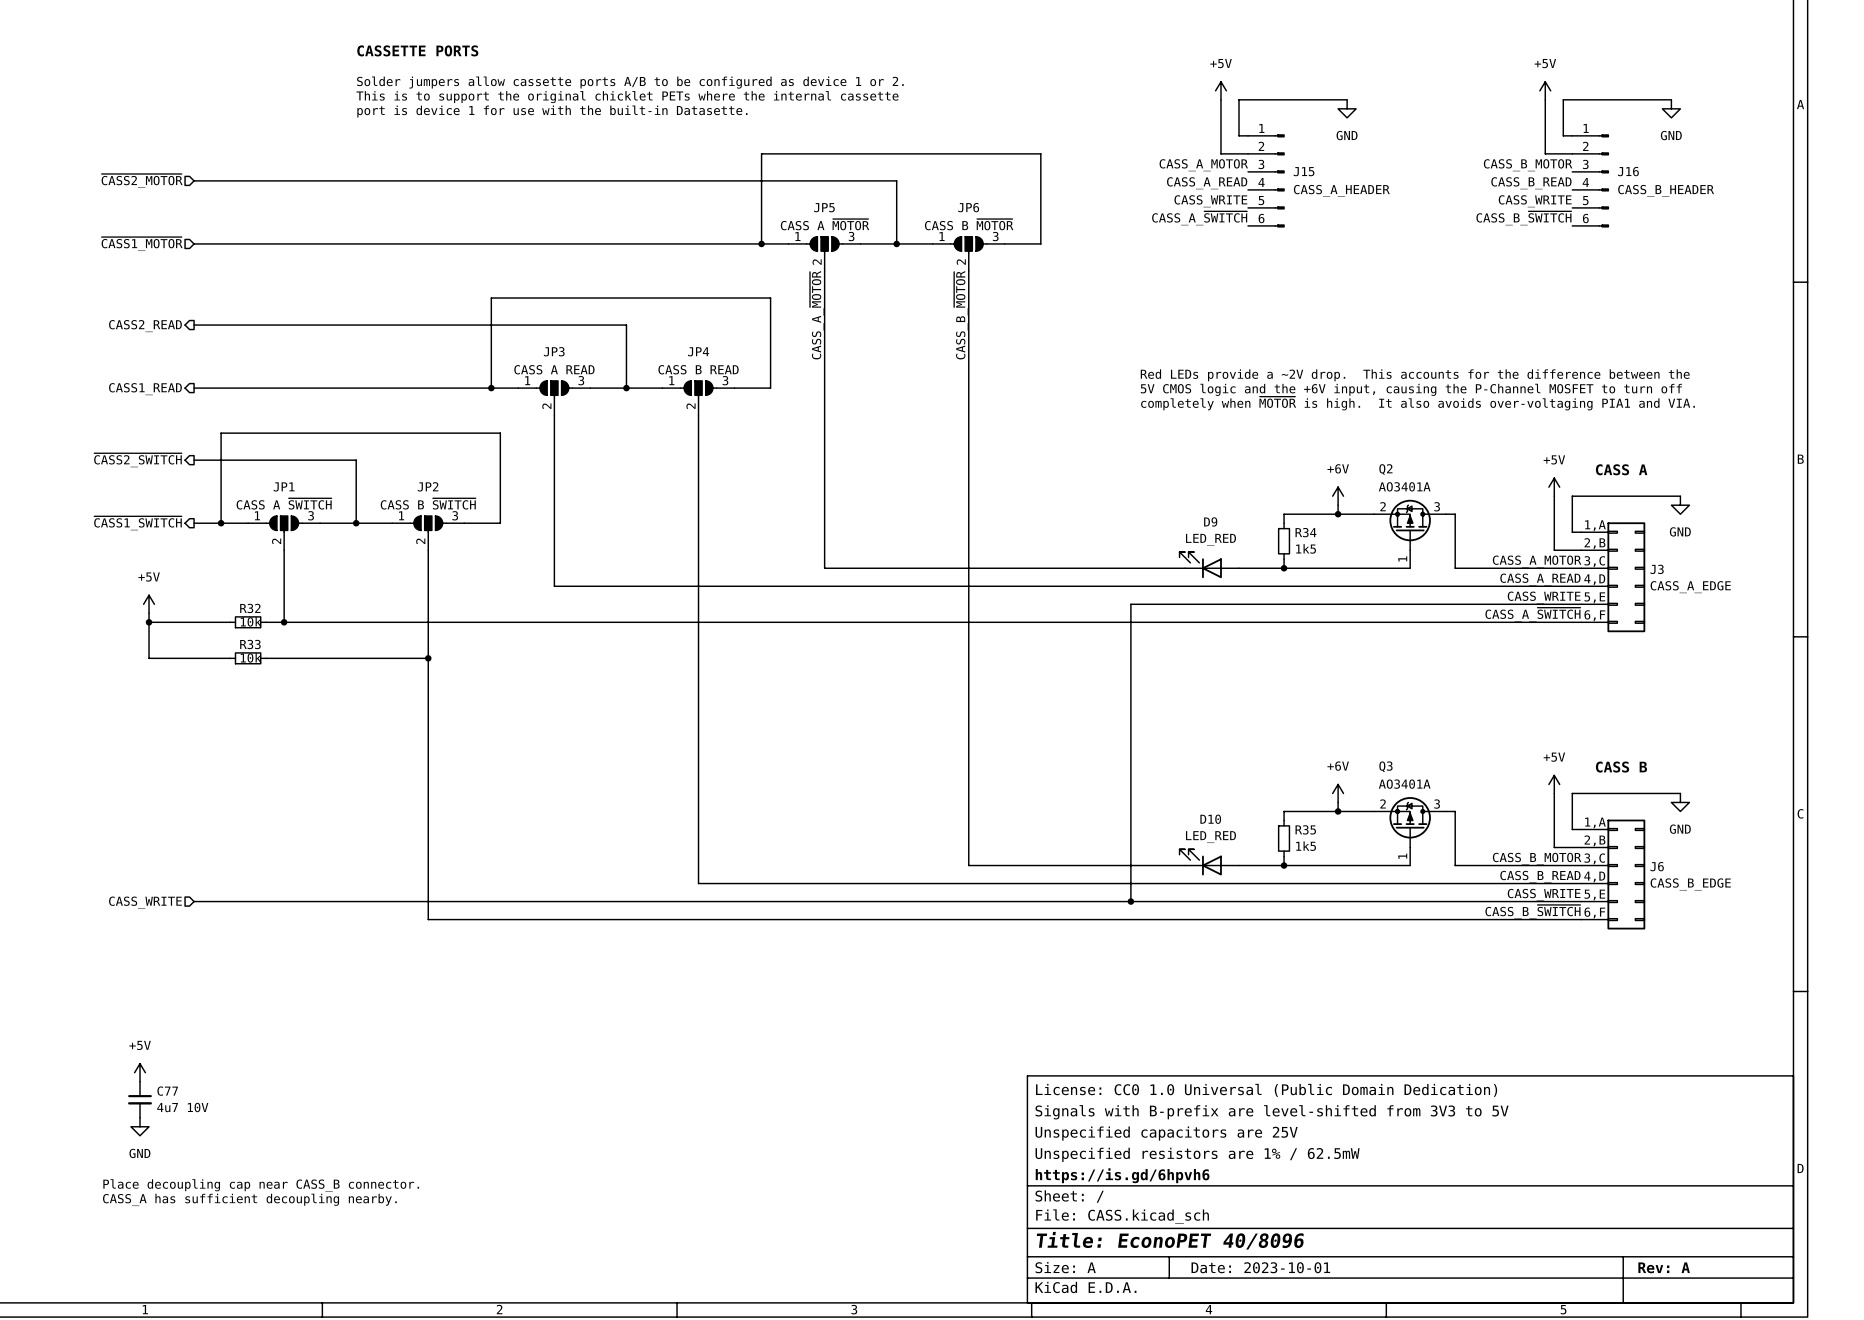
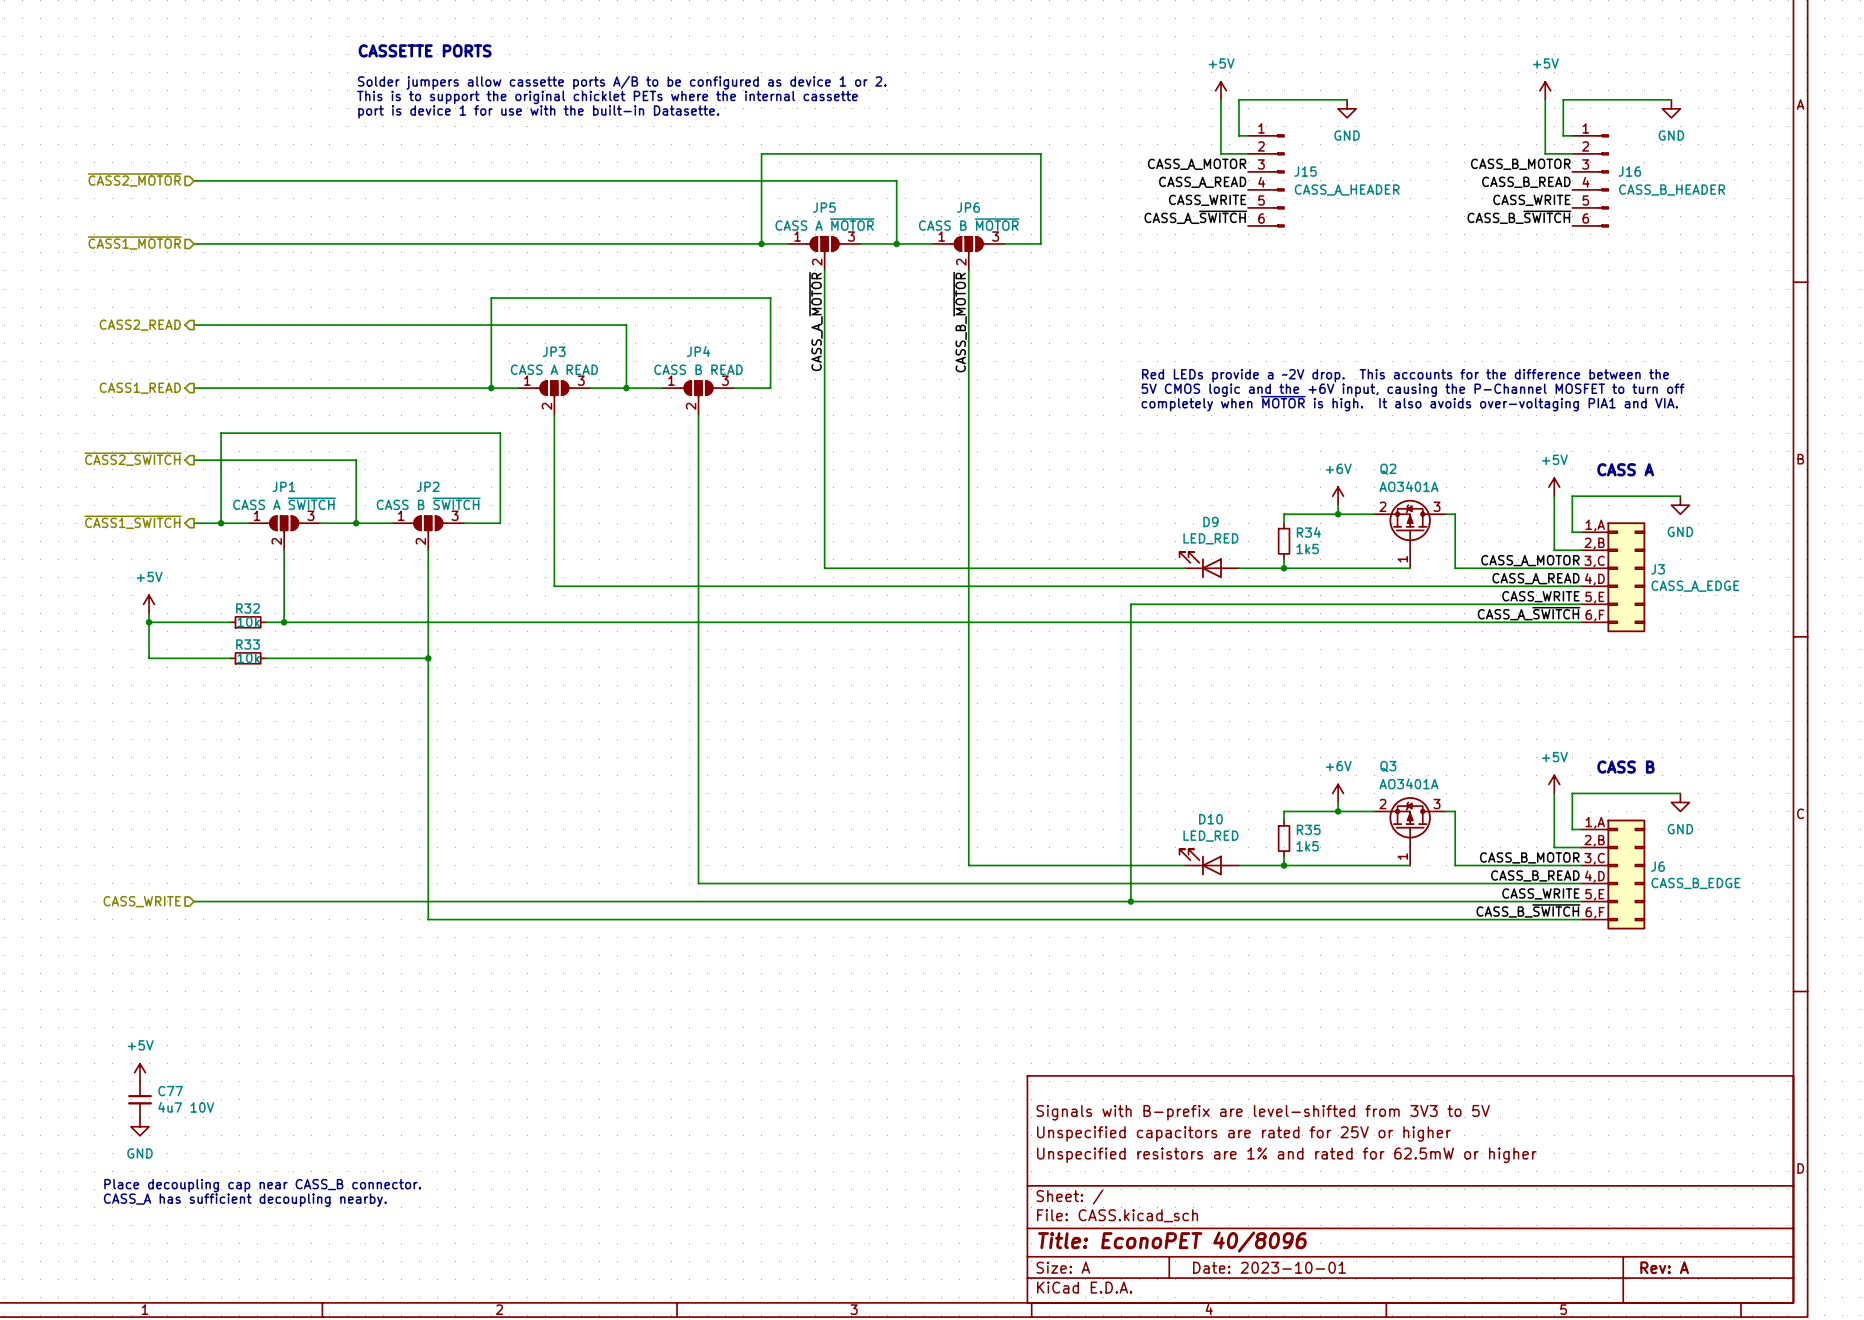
title block: License: CC0 1.0 Universal (Public Domain Dedication) (1266, 1090) -> none
title block: Unspecified capacitors are 25V (1166, 1133) -> Unspecified capacitors are rated for 25V or higher (1243, 1134)
title block: Unspecified resistors are 1% / 62.5mW (1197, 1154) -> Unspecified resistors are 1% and rated for 62.5mW or higher (1286, 1155)
title block: https://is.gd/6hpvh6 (1122, 1175) -> none

